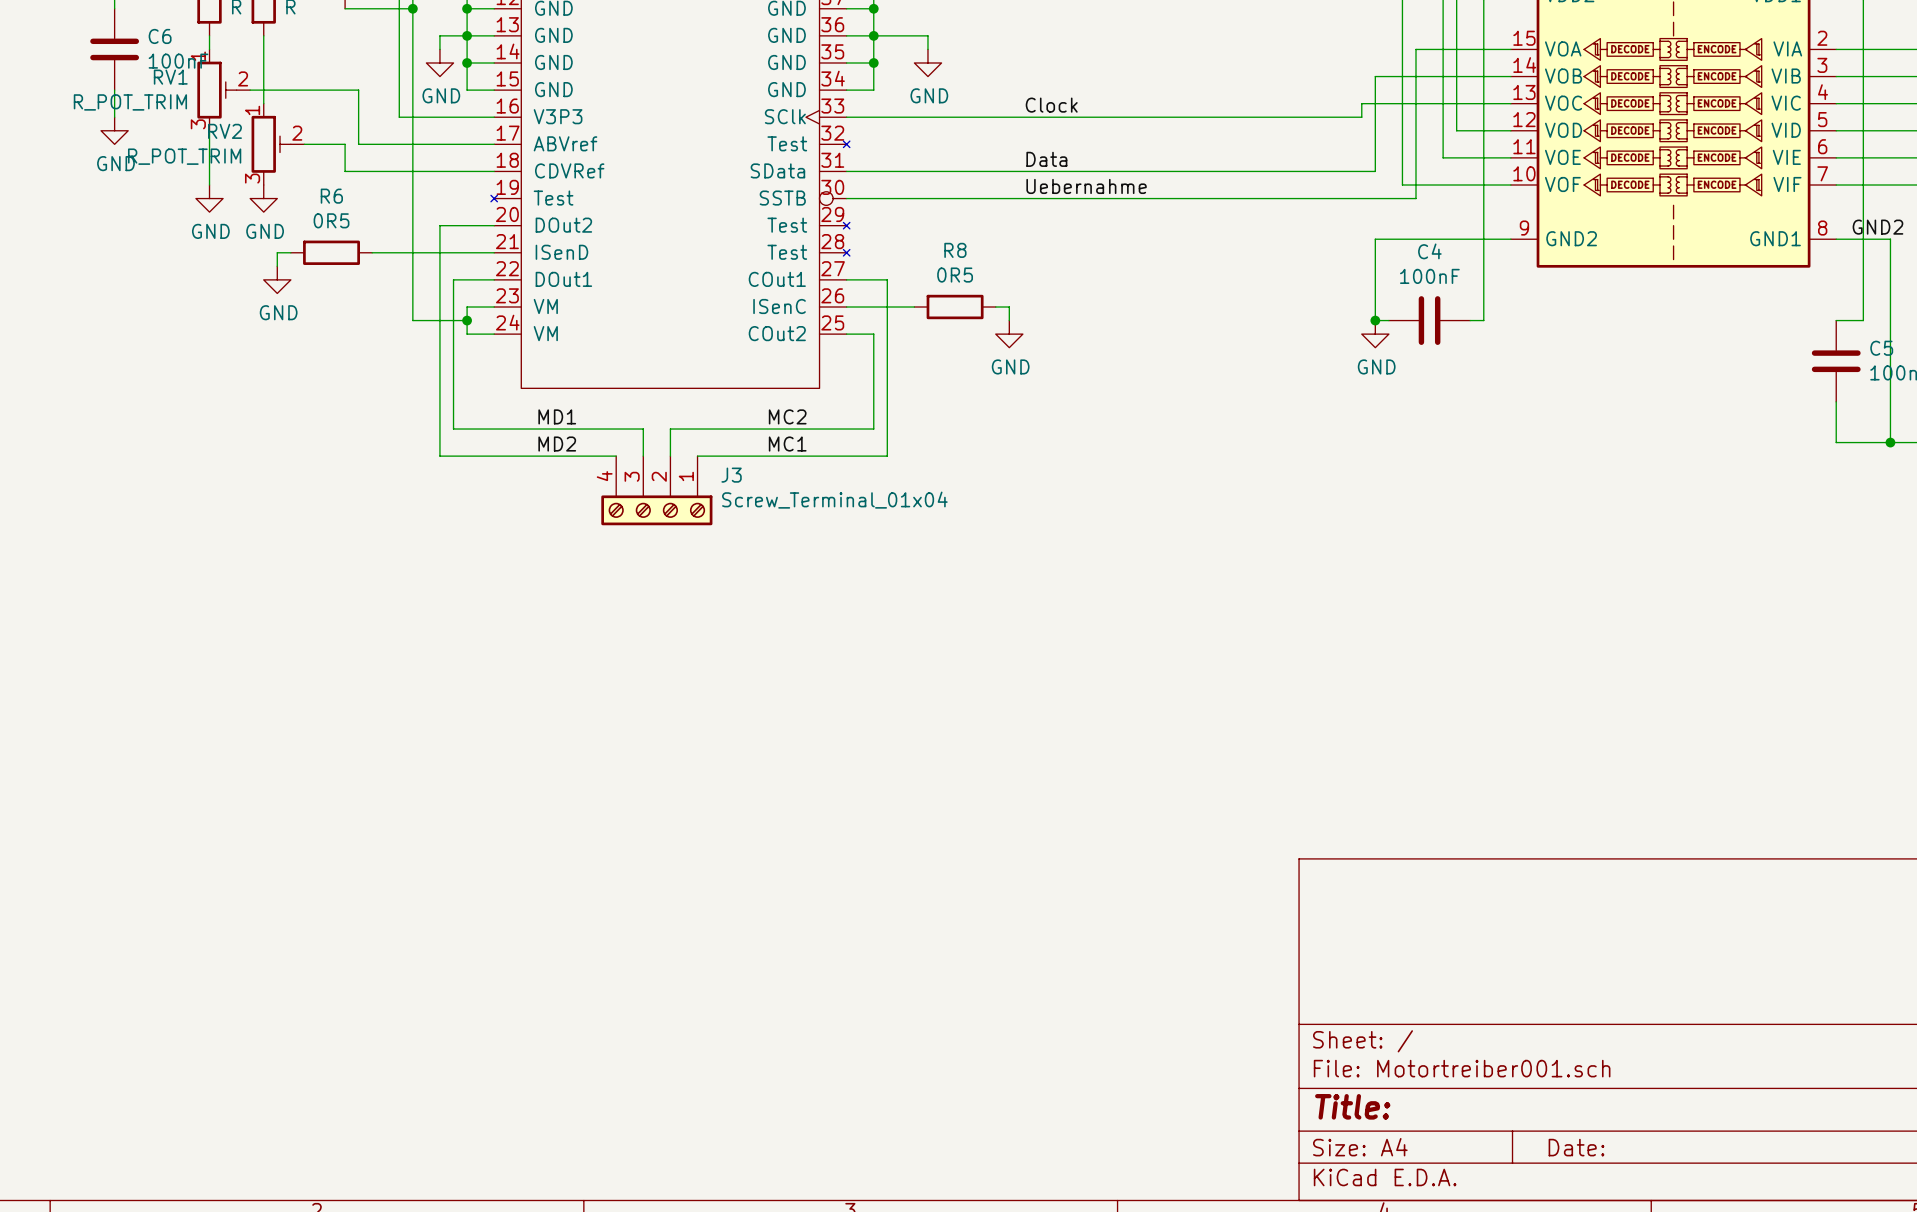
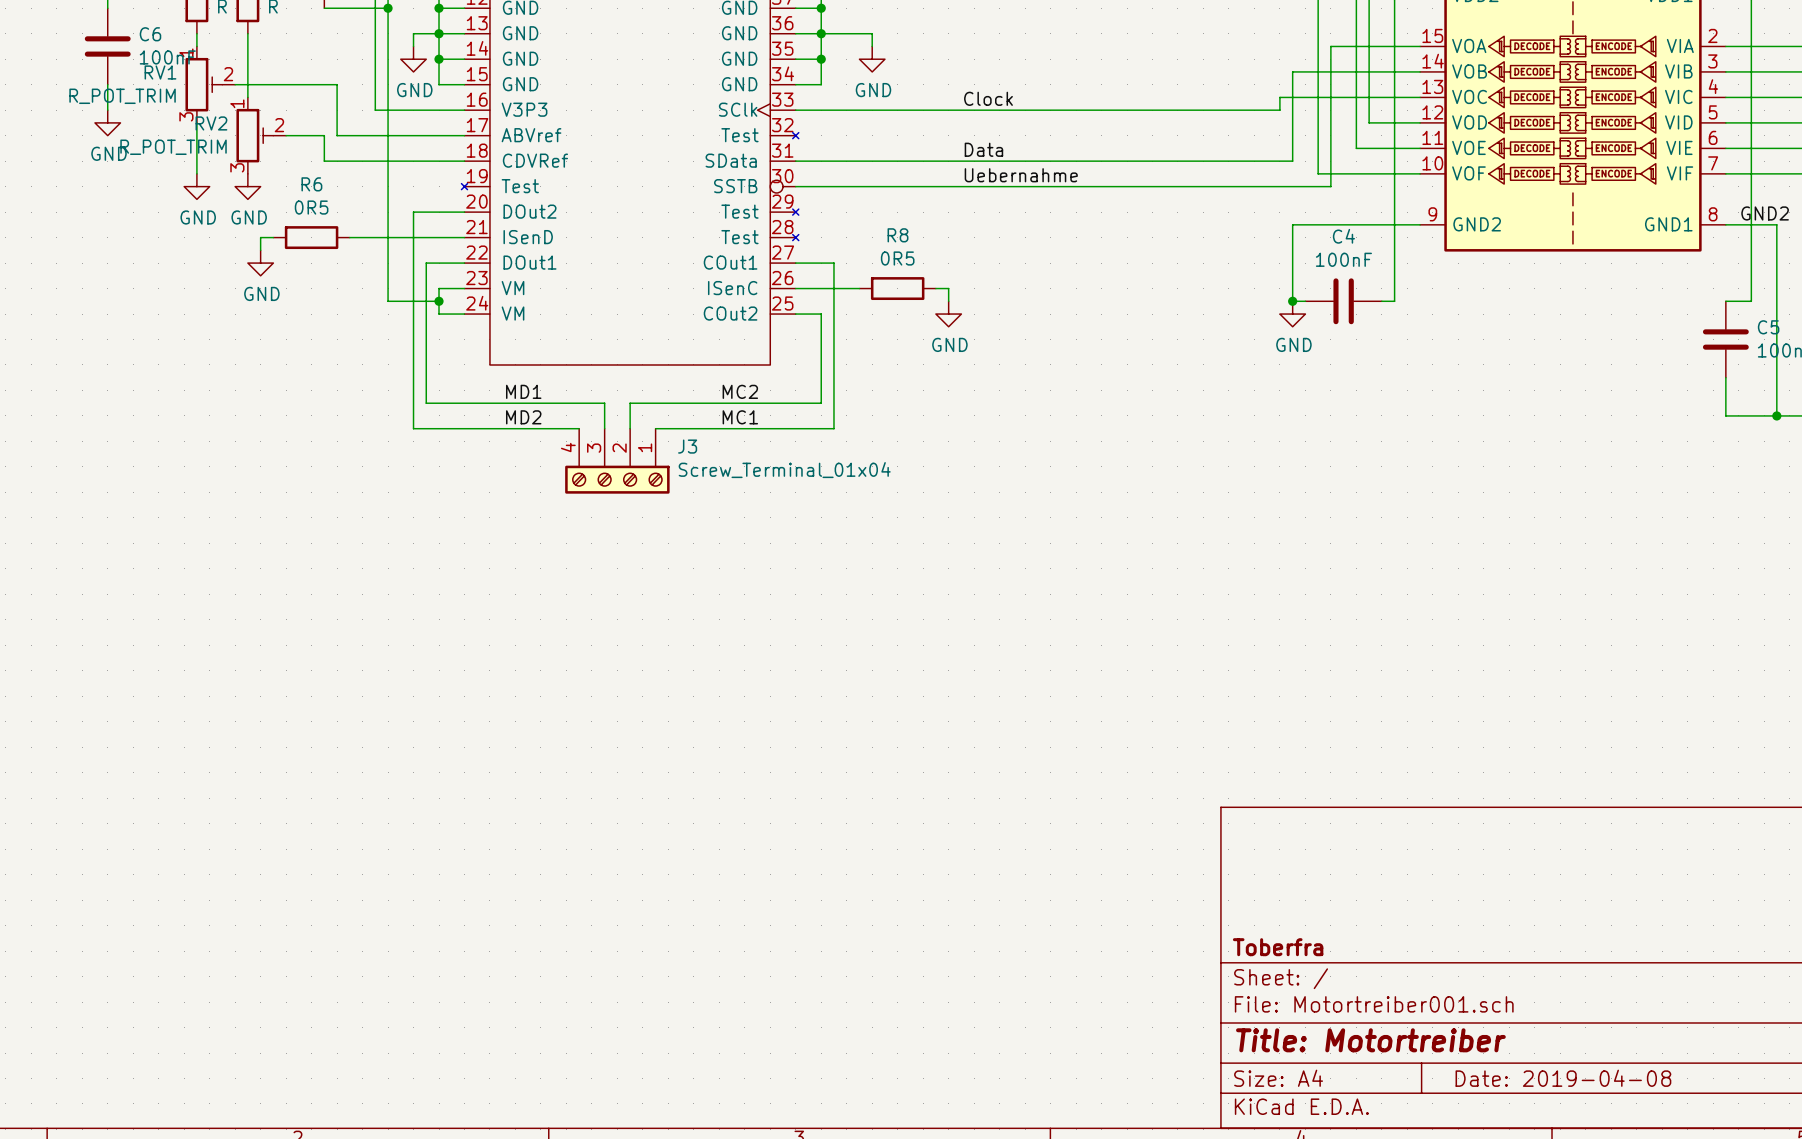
title block: none -> Toberfra (1278, 947)
title block: Title: (1352, 1106) -> Title: Motortreiber (1370, 1040)
title block: Date: (1576, 1147) -> Date: 2019-04-08 (1563, 1078)

